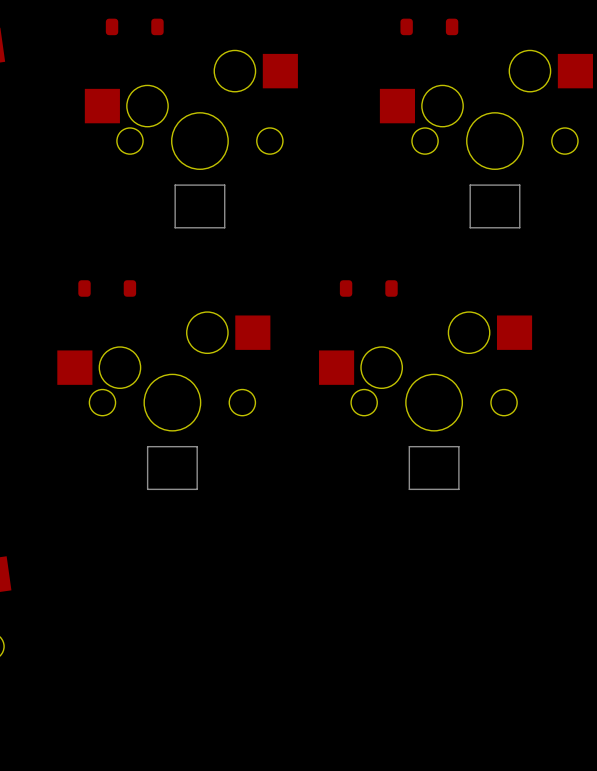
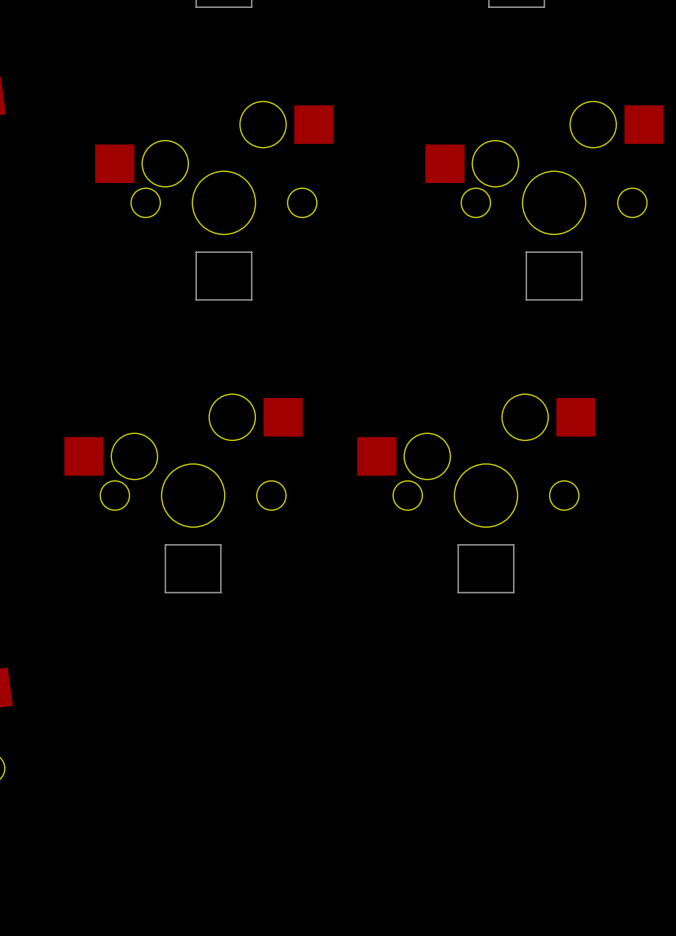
part: (134, 26) -> none
part: (429, 26) -> none
part: (107, 288) -> none
part: (368, 288) -> none

